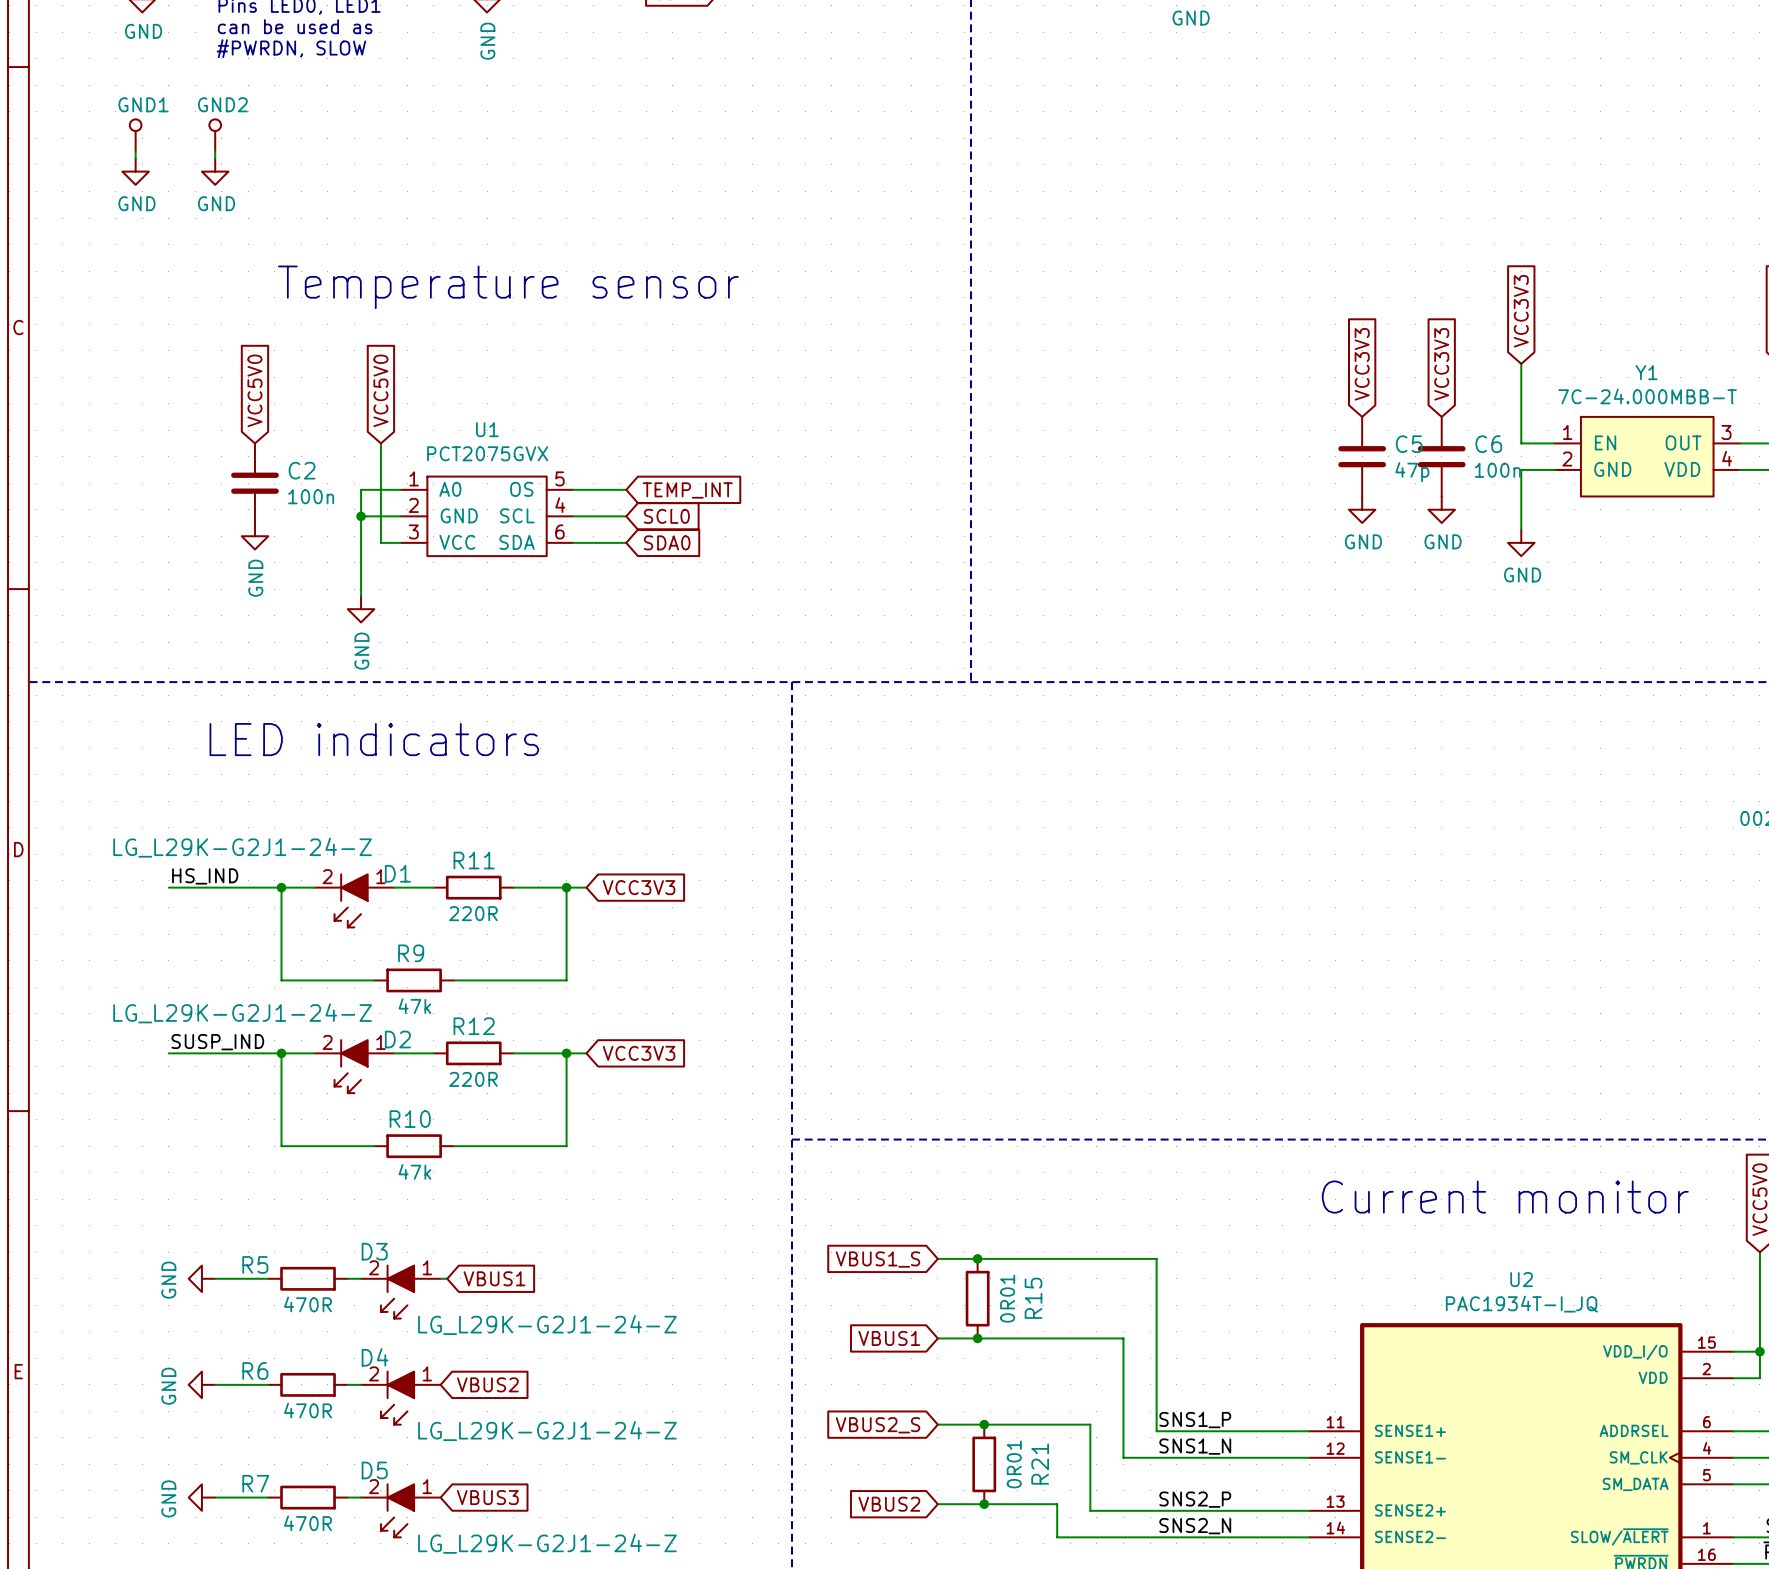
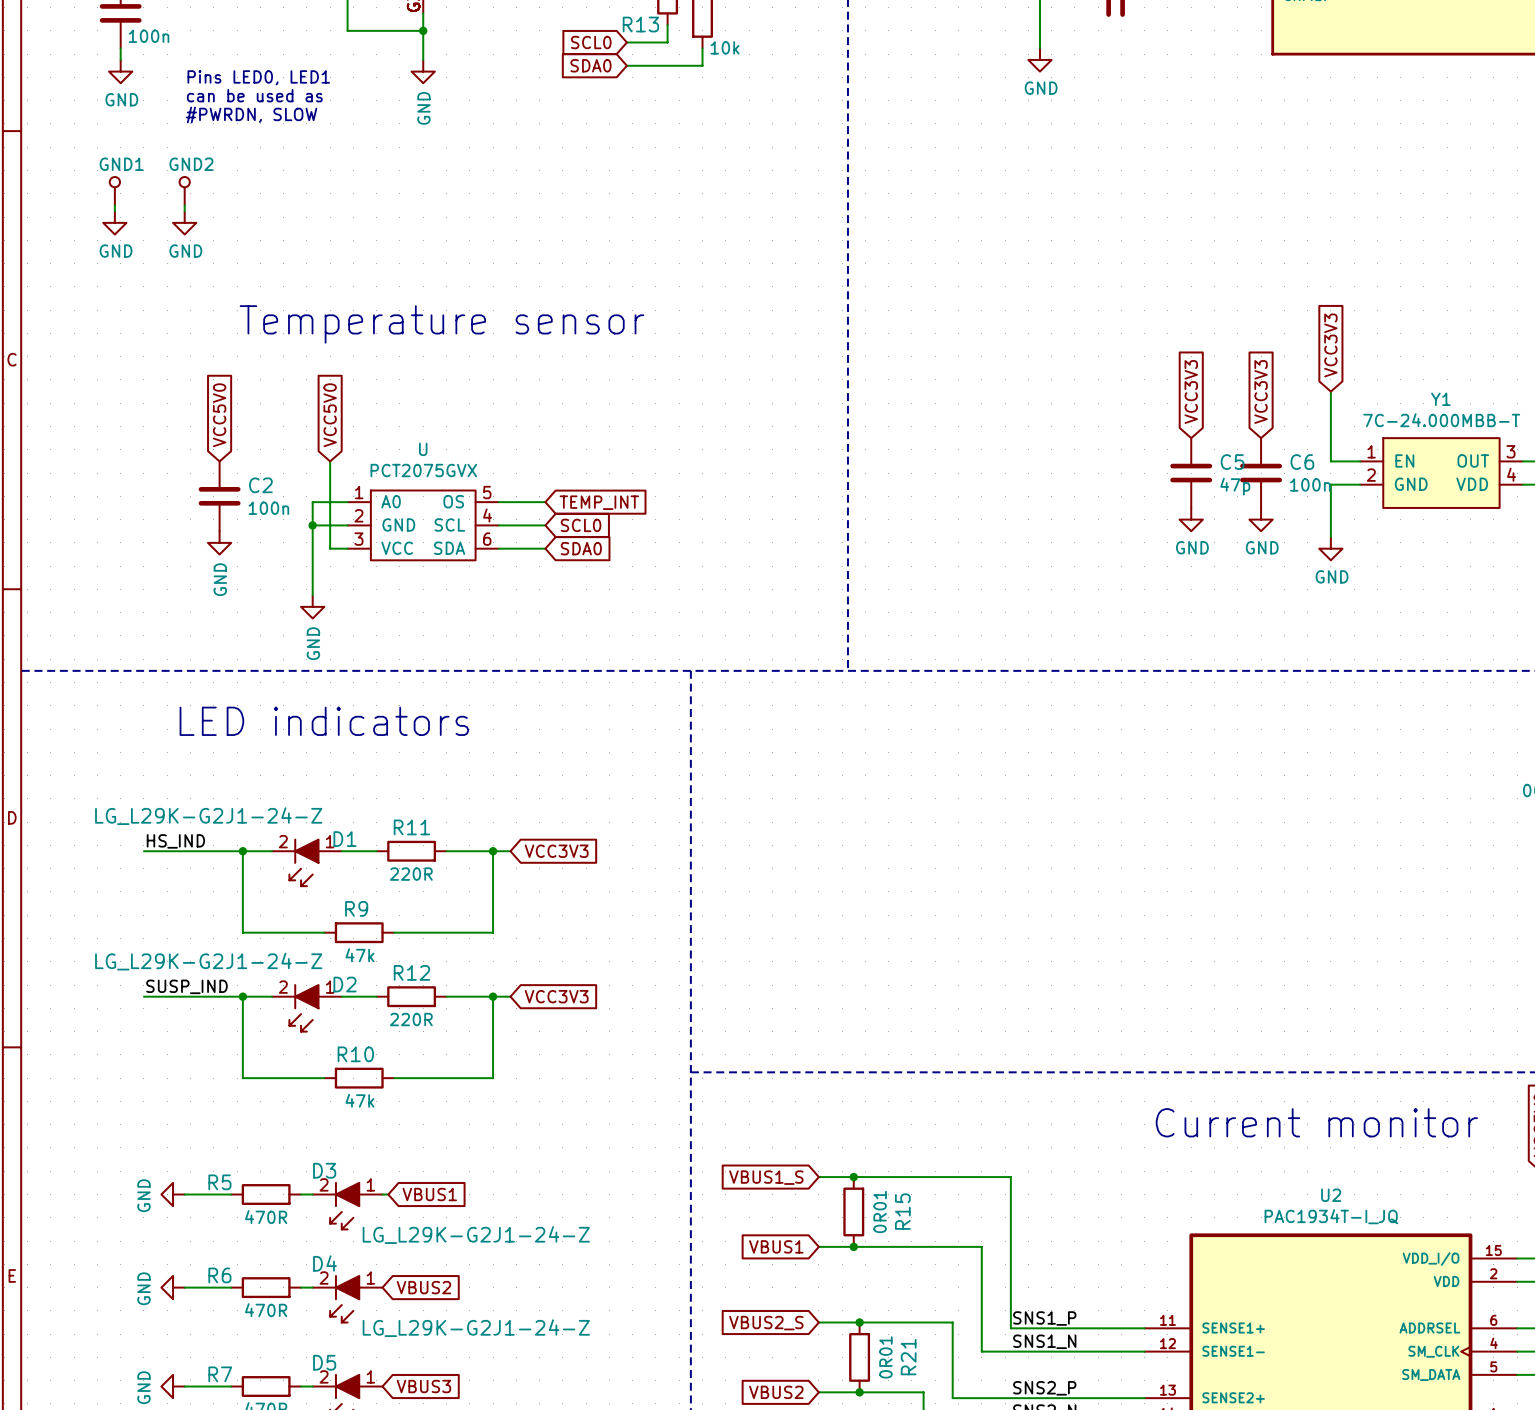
U1 name: U1 (487, 429) -> U (423, 449)

